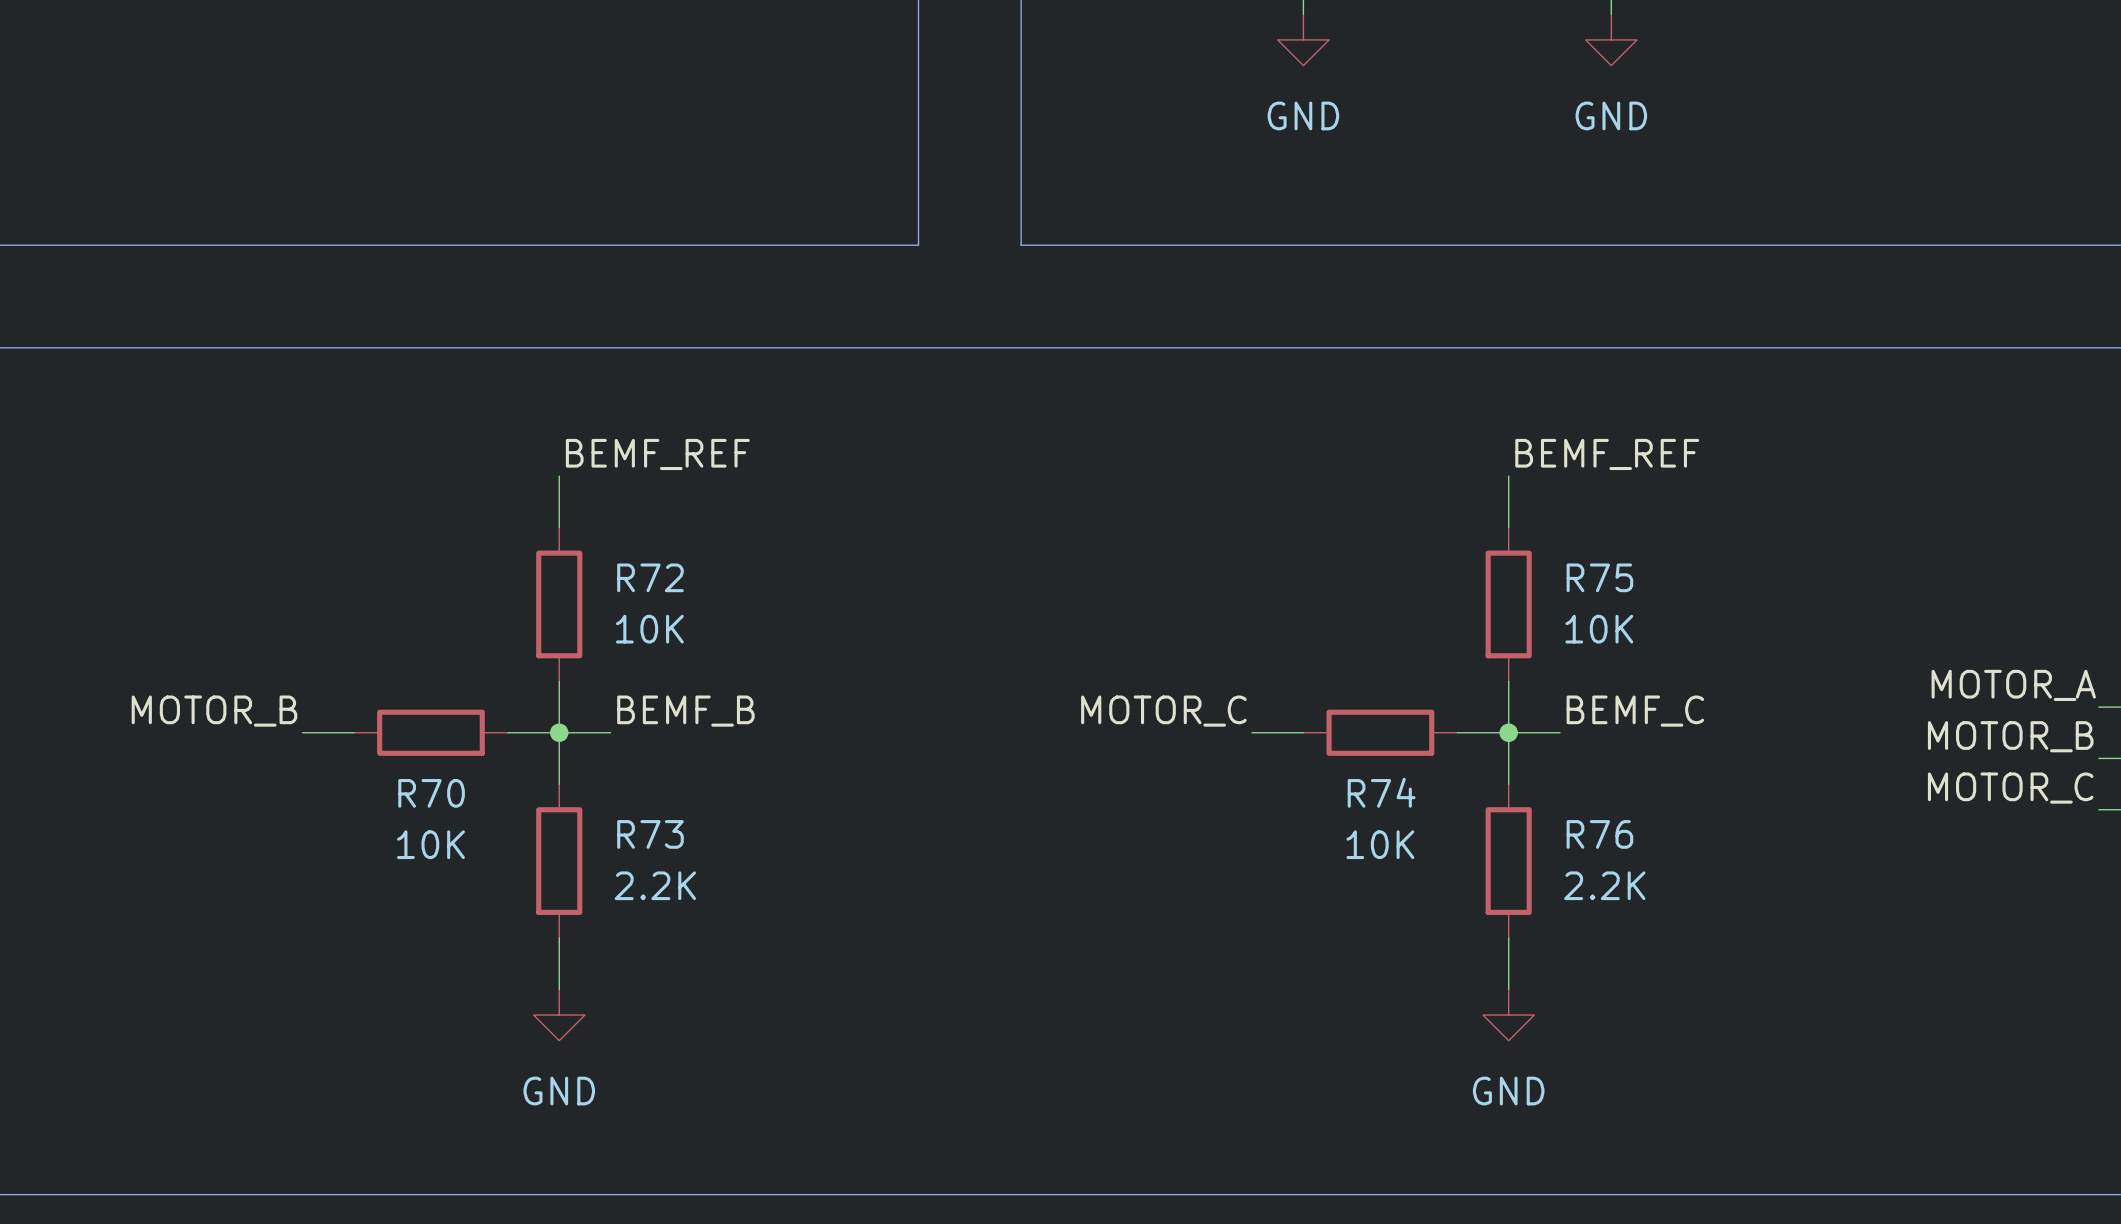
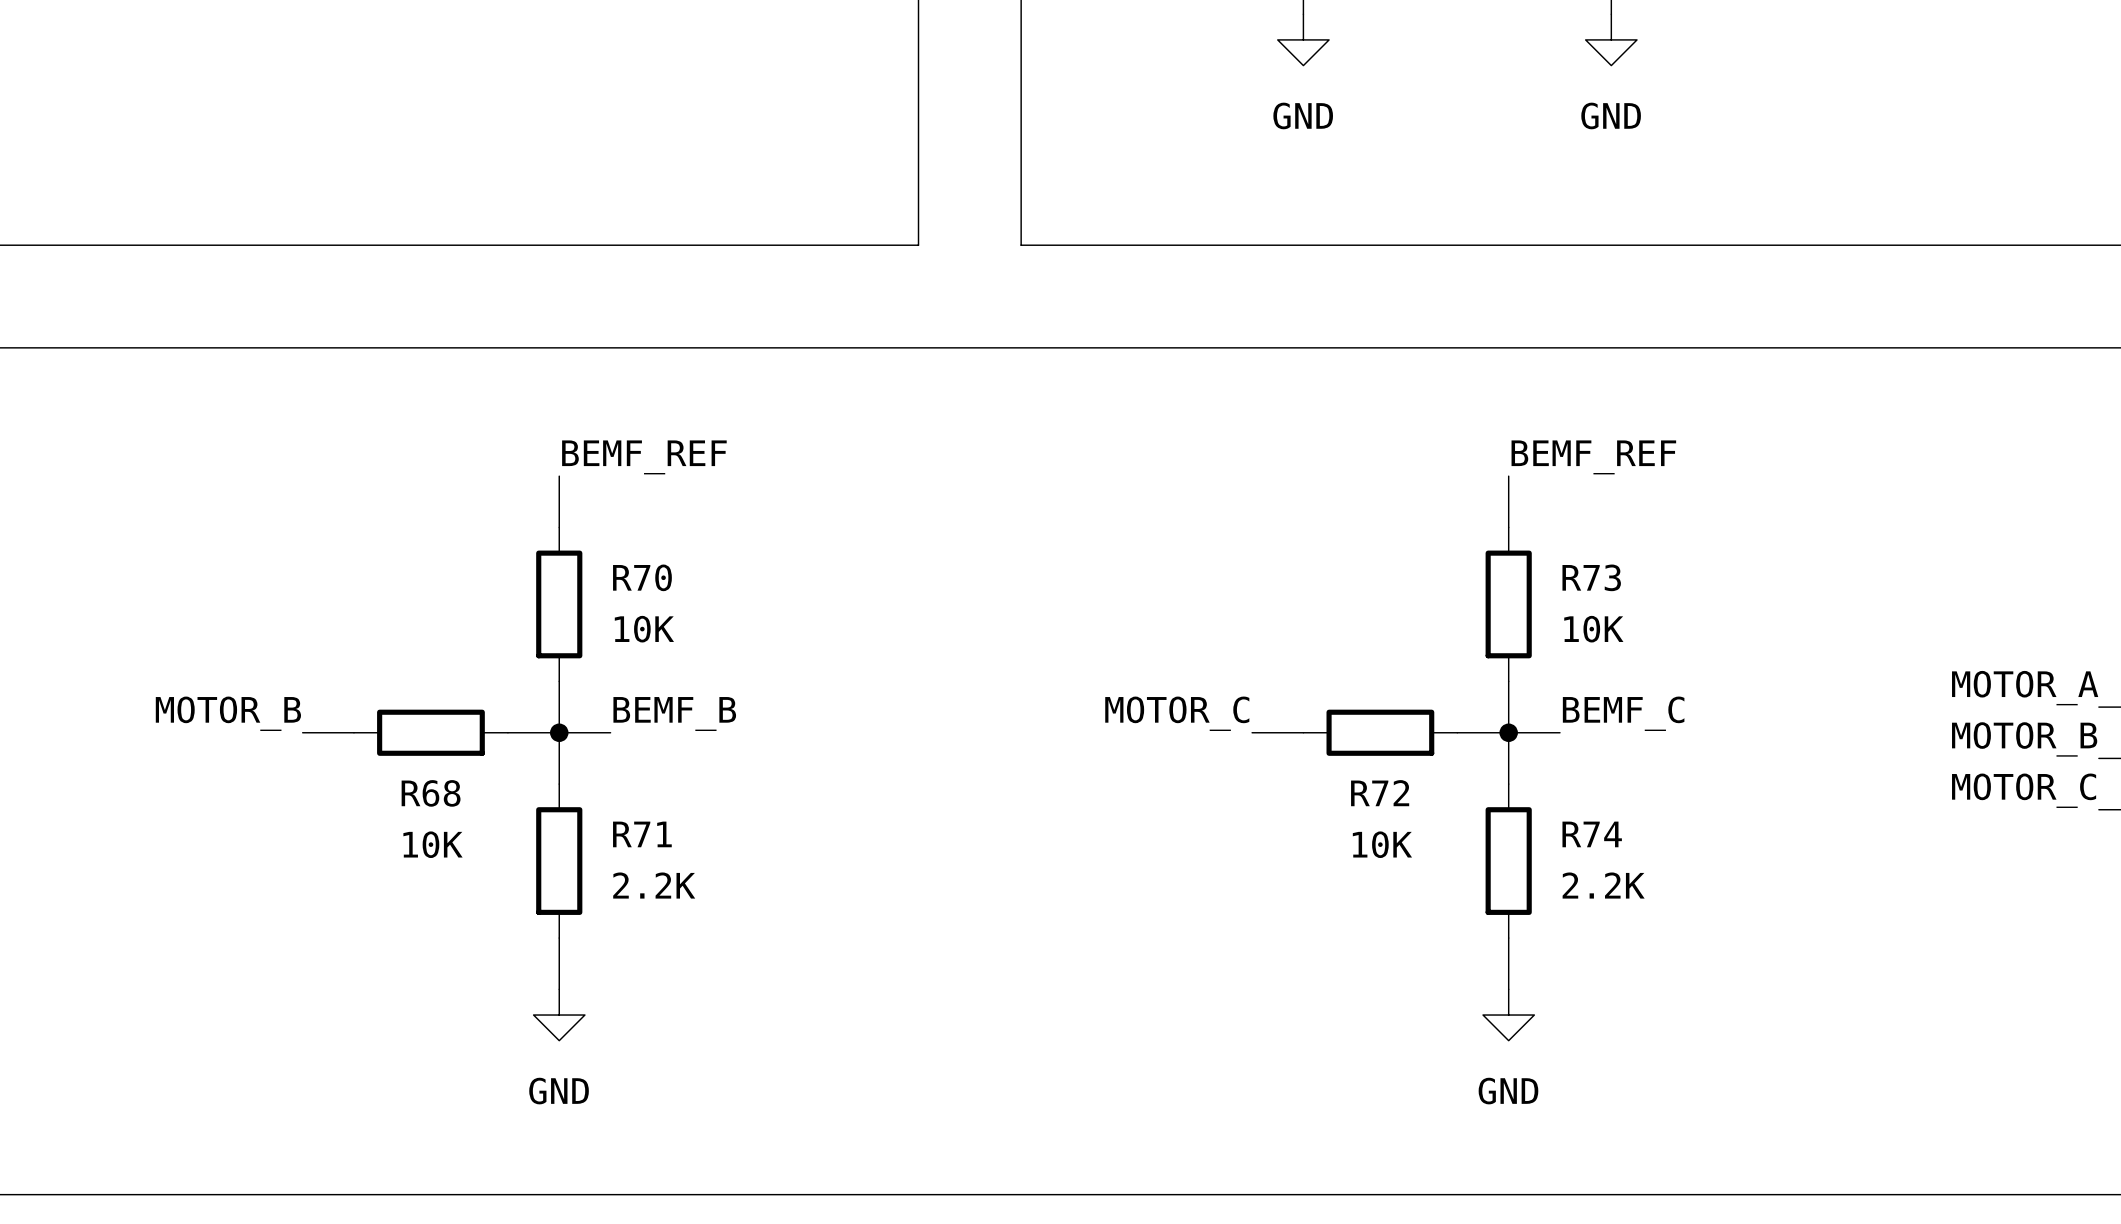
R72 name: R72 (650, 577) -> R70 (642, 577)
R75 name: R75 (1599, 577) -> R73 (1591, 577)
R74 name: R74 (1381, 792) -> R72 (1380, 793)
R70 name: R70 (431, 793) -> R68 (431, 793)
R73 name: R73 (650, 834) -> R71 (642, 834)
R76 name: R76 (1599, 834) -> R74 (1592, 834)

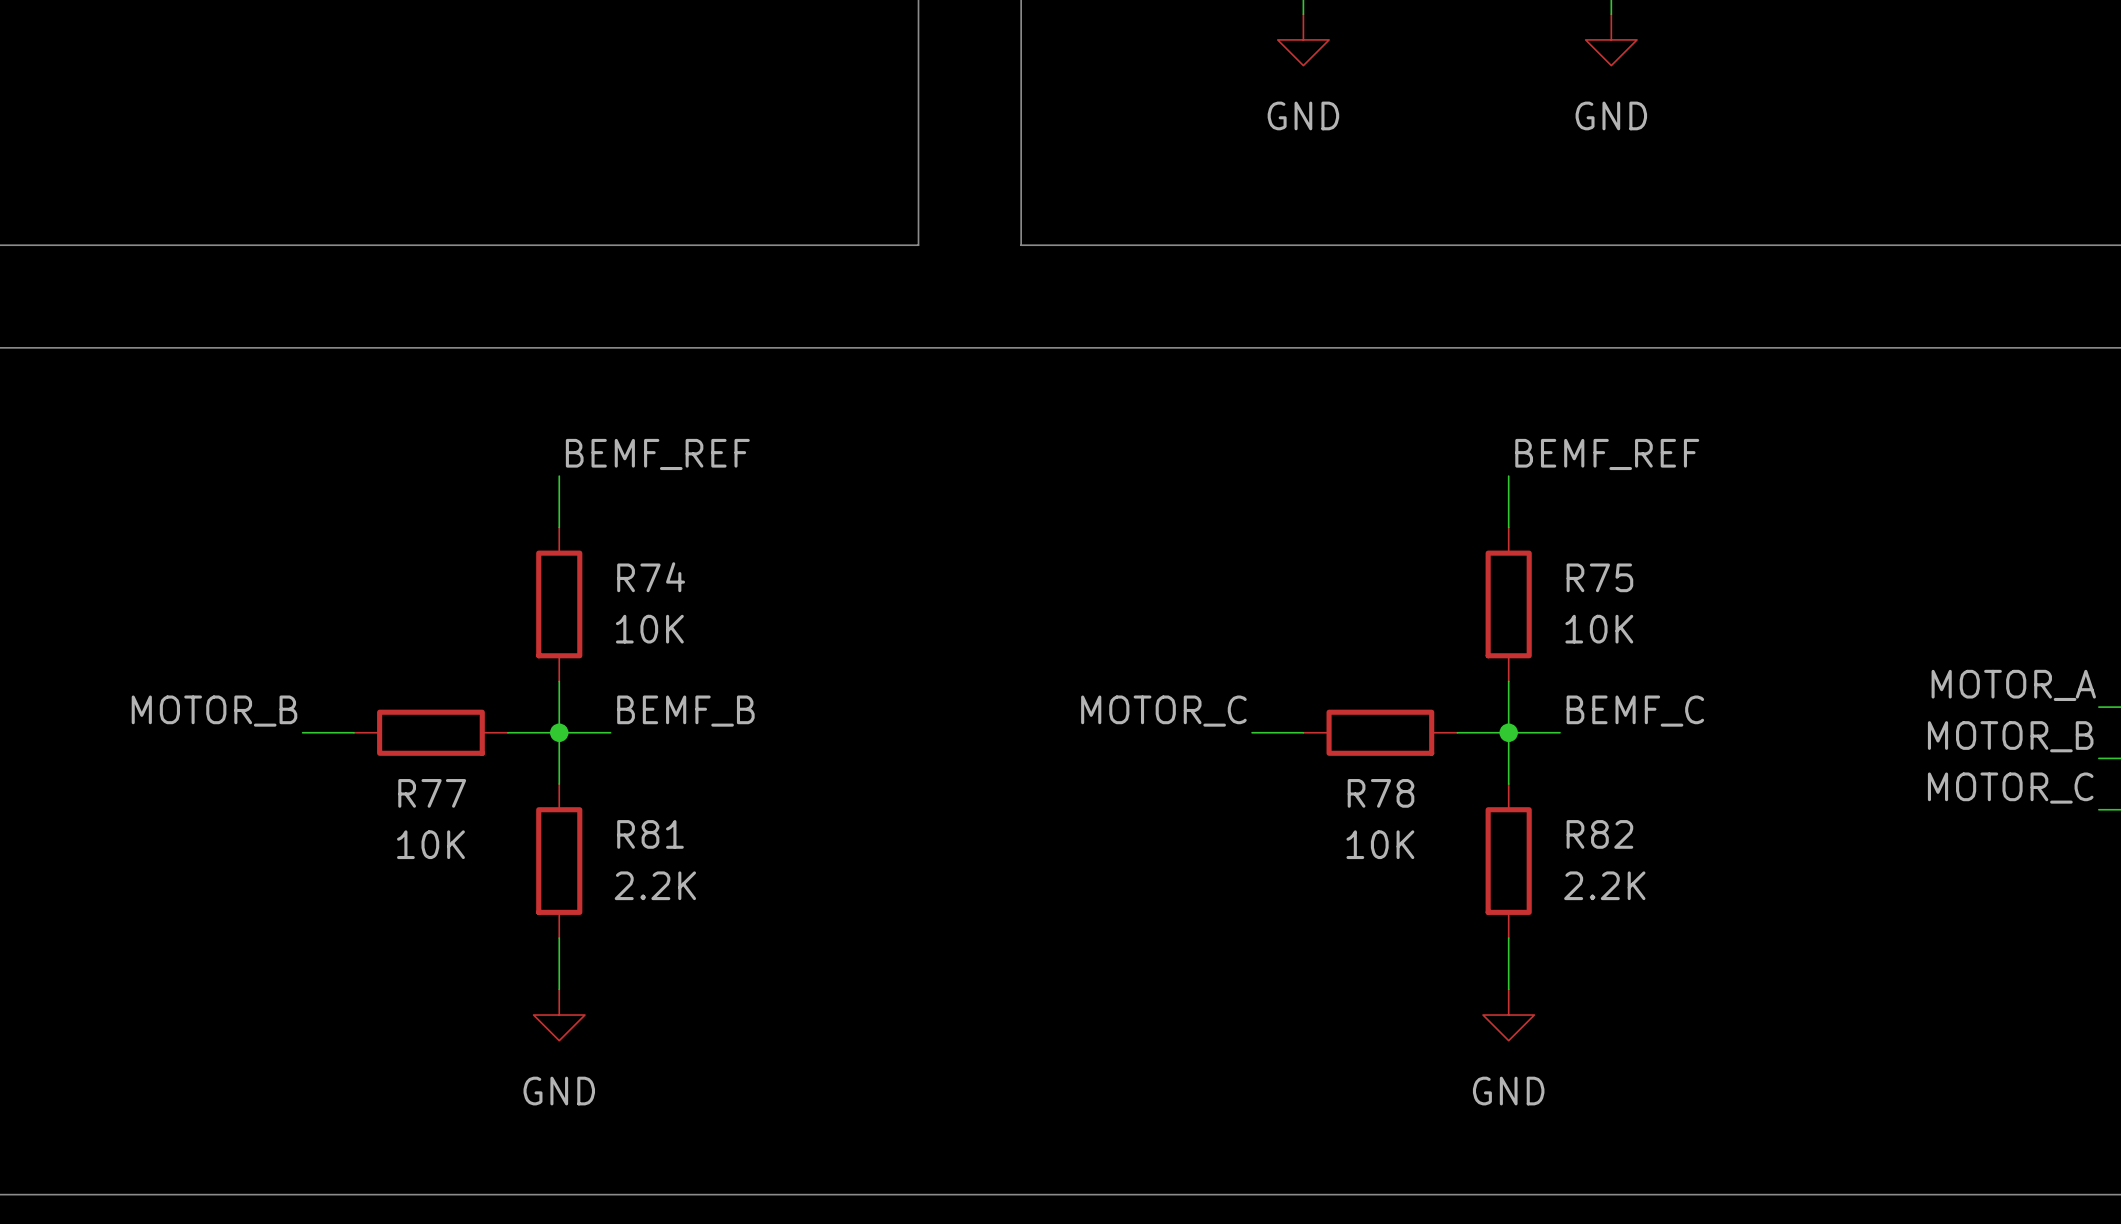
R70 name: R70 (642, 577) -> R74 (651, 577)
R73 name: R73 (1591, 577) -> R75 (1599, 577)
R68 name: R68 (431, 793) -> R77 (432, 793)
R72 name: R72 (1380, 793) -> R78 (1381, 793)
R71 name: R71 (642, 834) -> R81 (650, 834)
R74 name: R74 (1592, 834) -> R82 (1599, 834)

